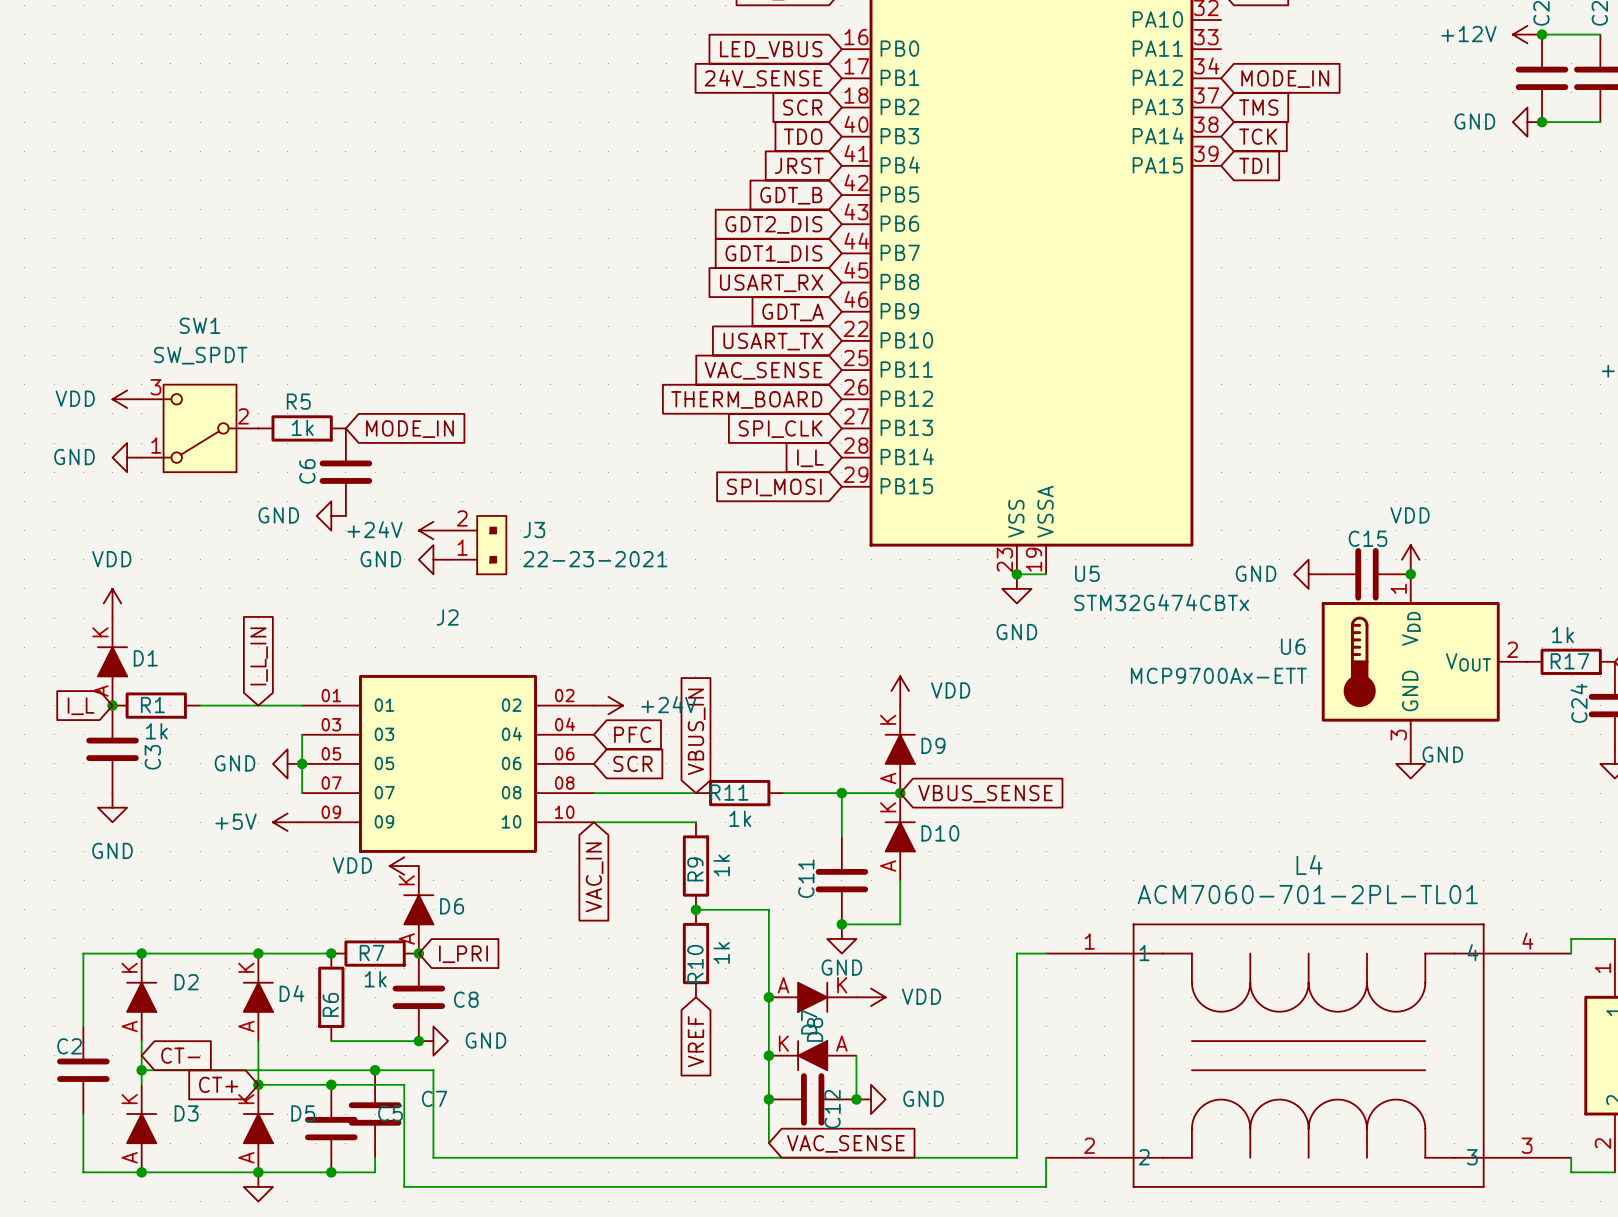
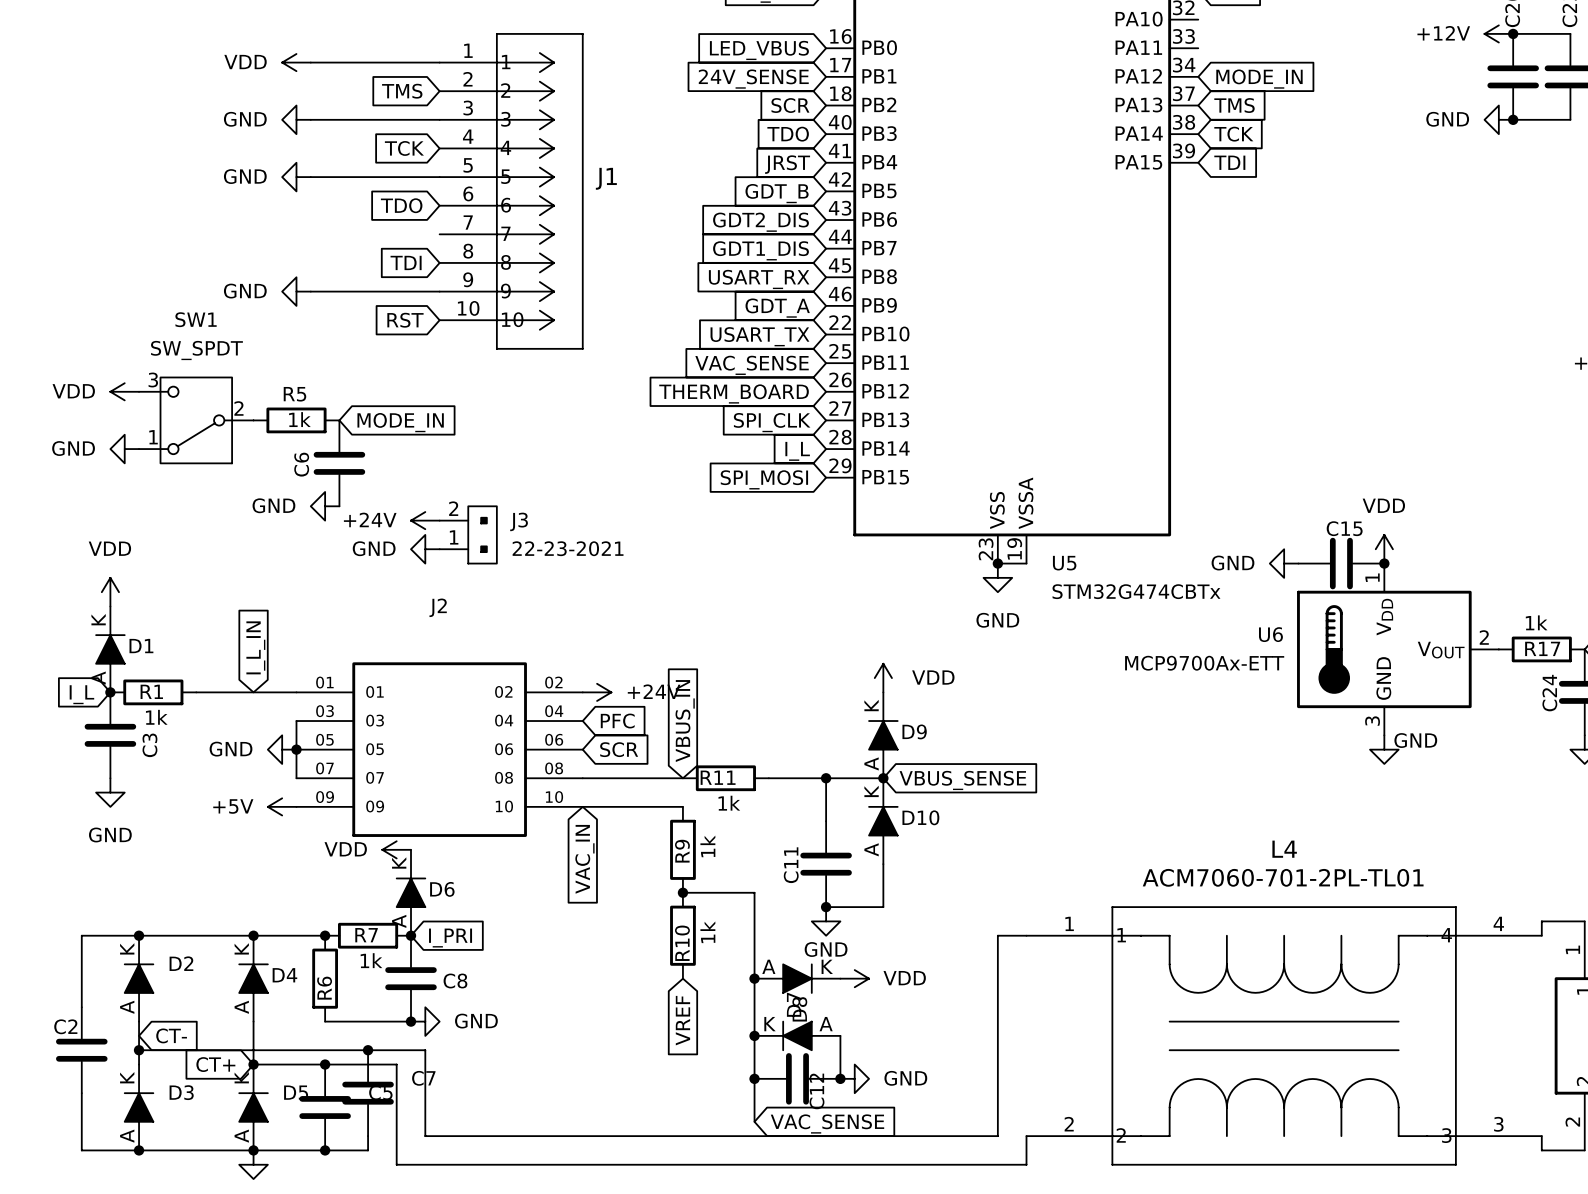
power symbol: none -> VDD (296, 62)
wire: none -> (310, 62) (439, 62)
global label: none -> TMS (402, 91)
power symbol: none -> GND (296, 119)
wire: none -> (310, 119) (439, 119)
global label: none -> TCK (404, 148)
power symbol: none -> GND (296, 177)
wire: none -> (310, 177) (439, 177)
J1: none -> (511, 191)
global label: none -> TDO (401, 205)
global label: none -> TDI (406, 262)
power symbol: none -> GND (296, 291)
wire: none -> (310, 291) (439, 291)
global label: none -> RST (405, 320)

